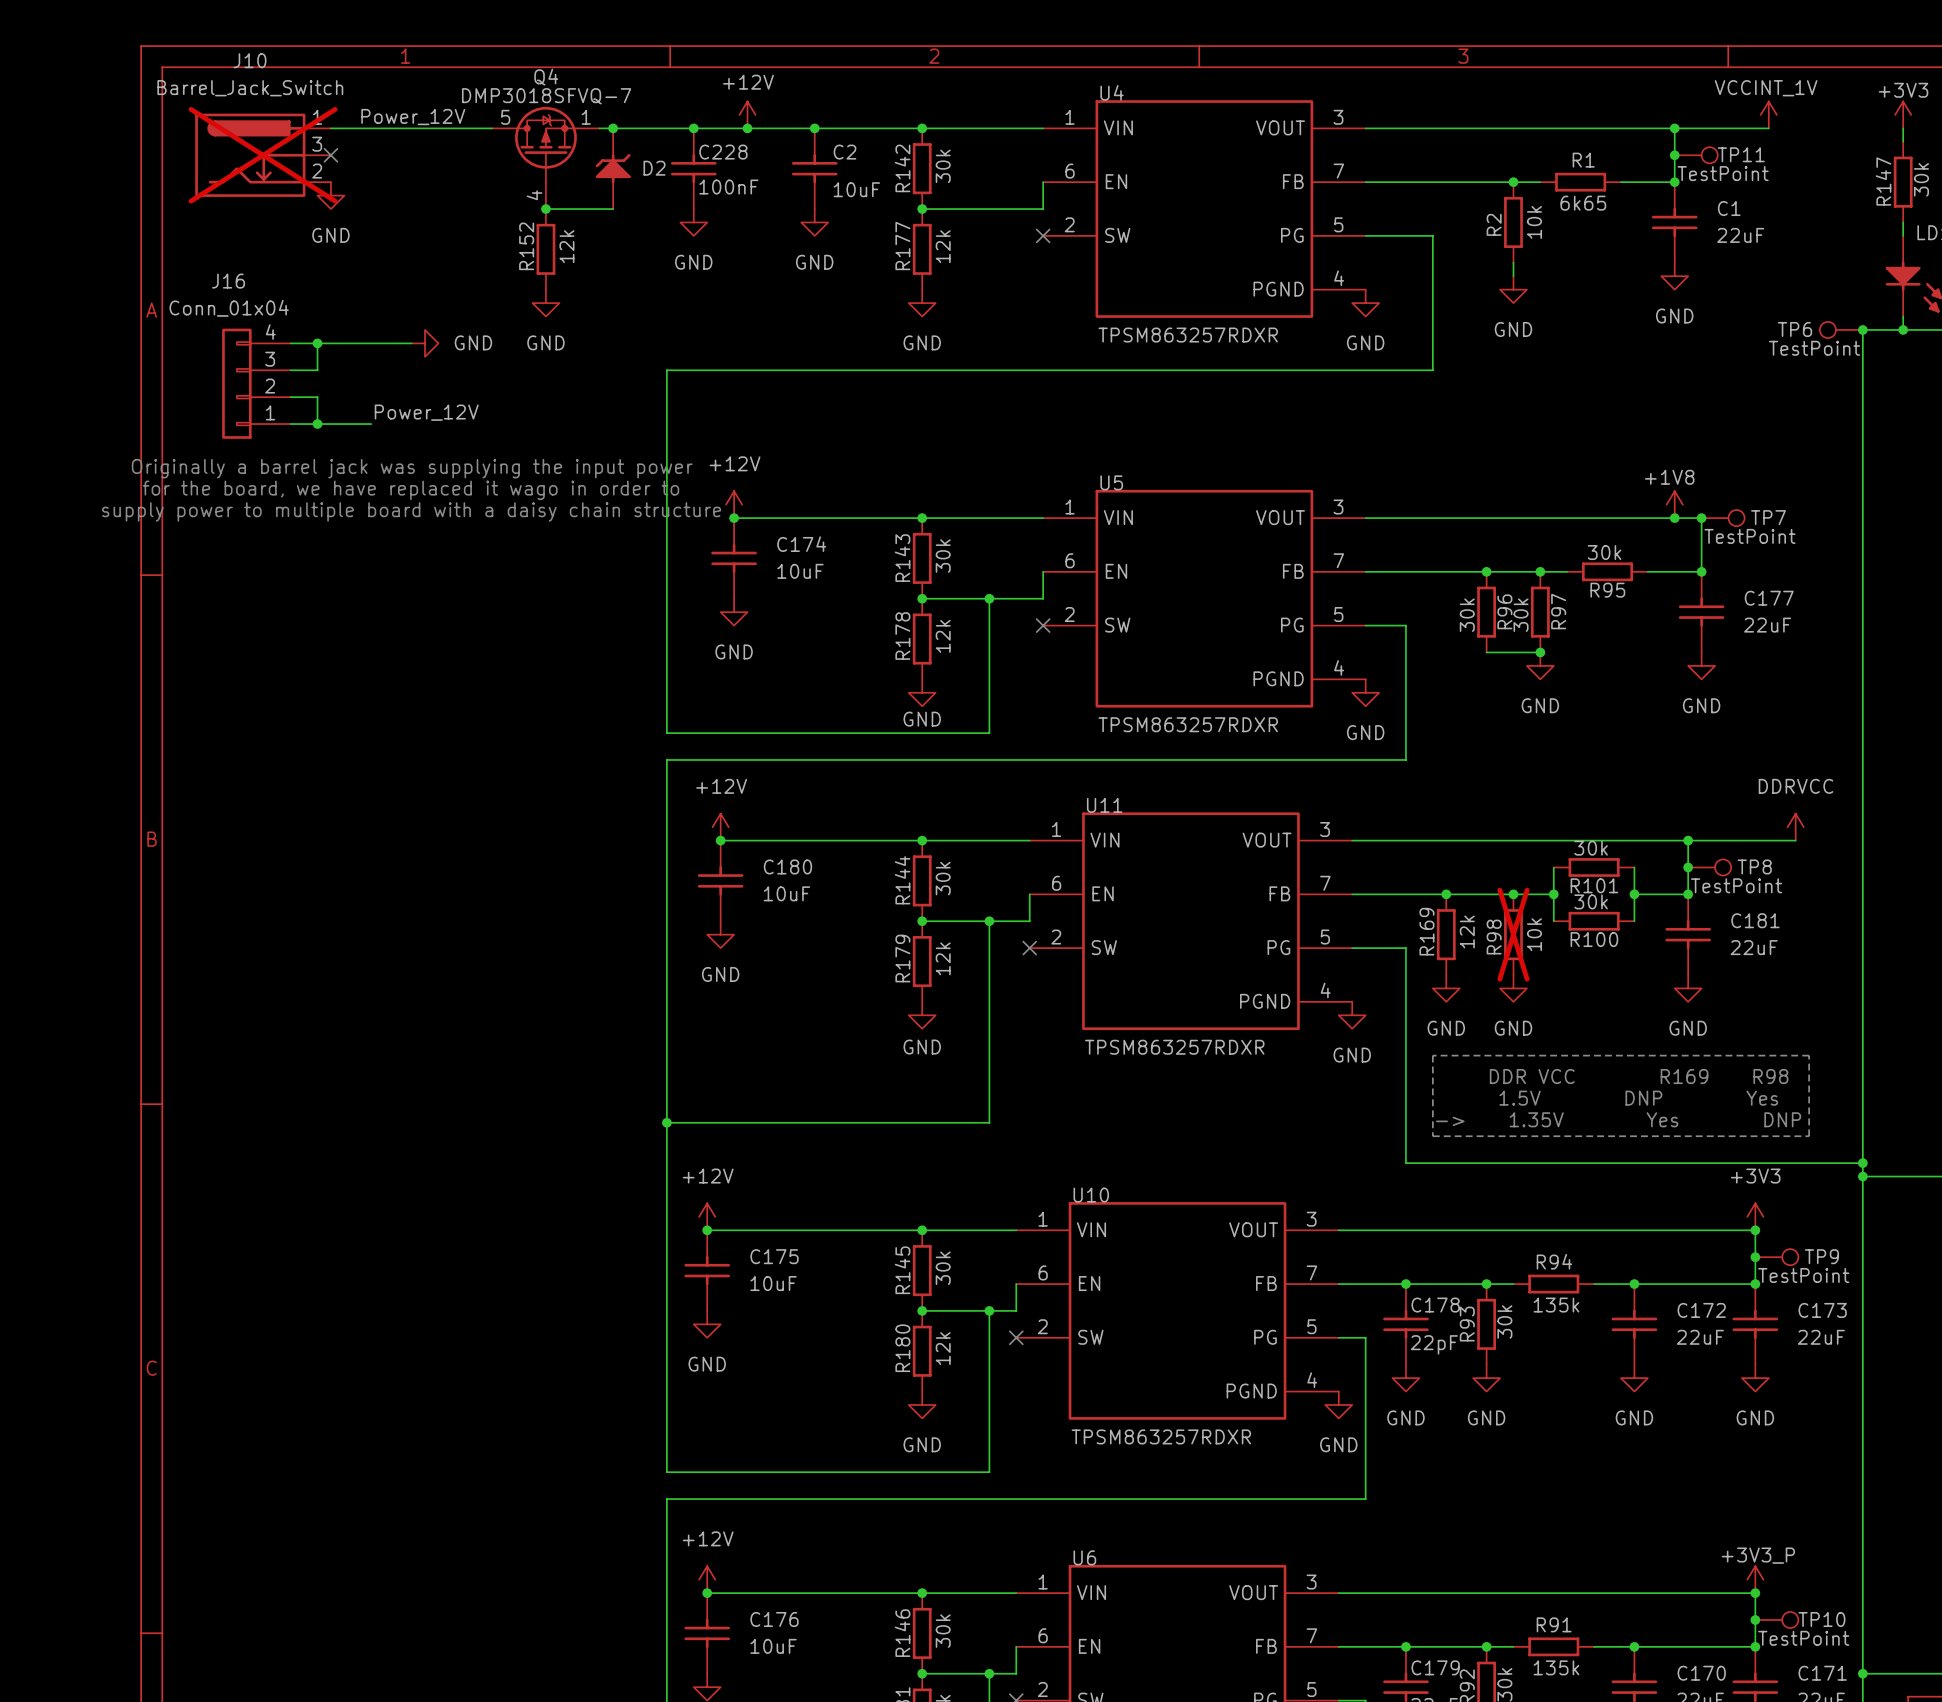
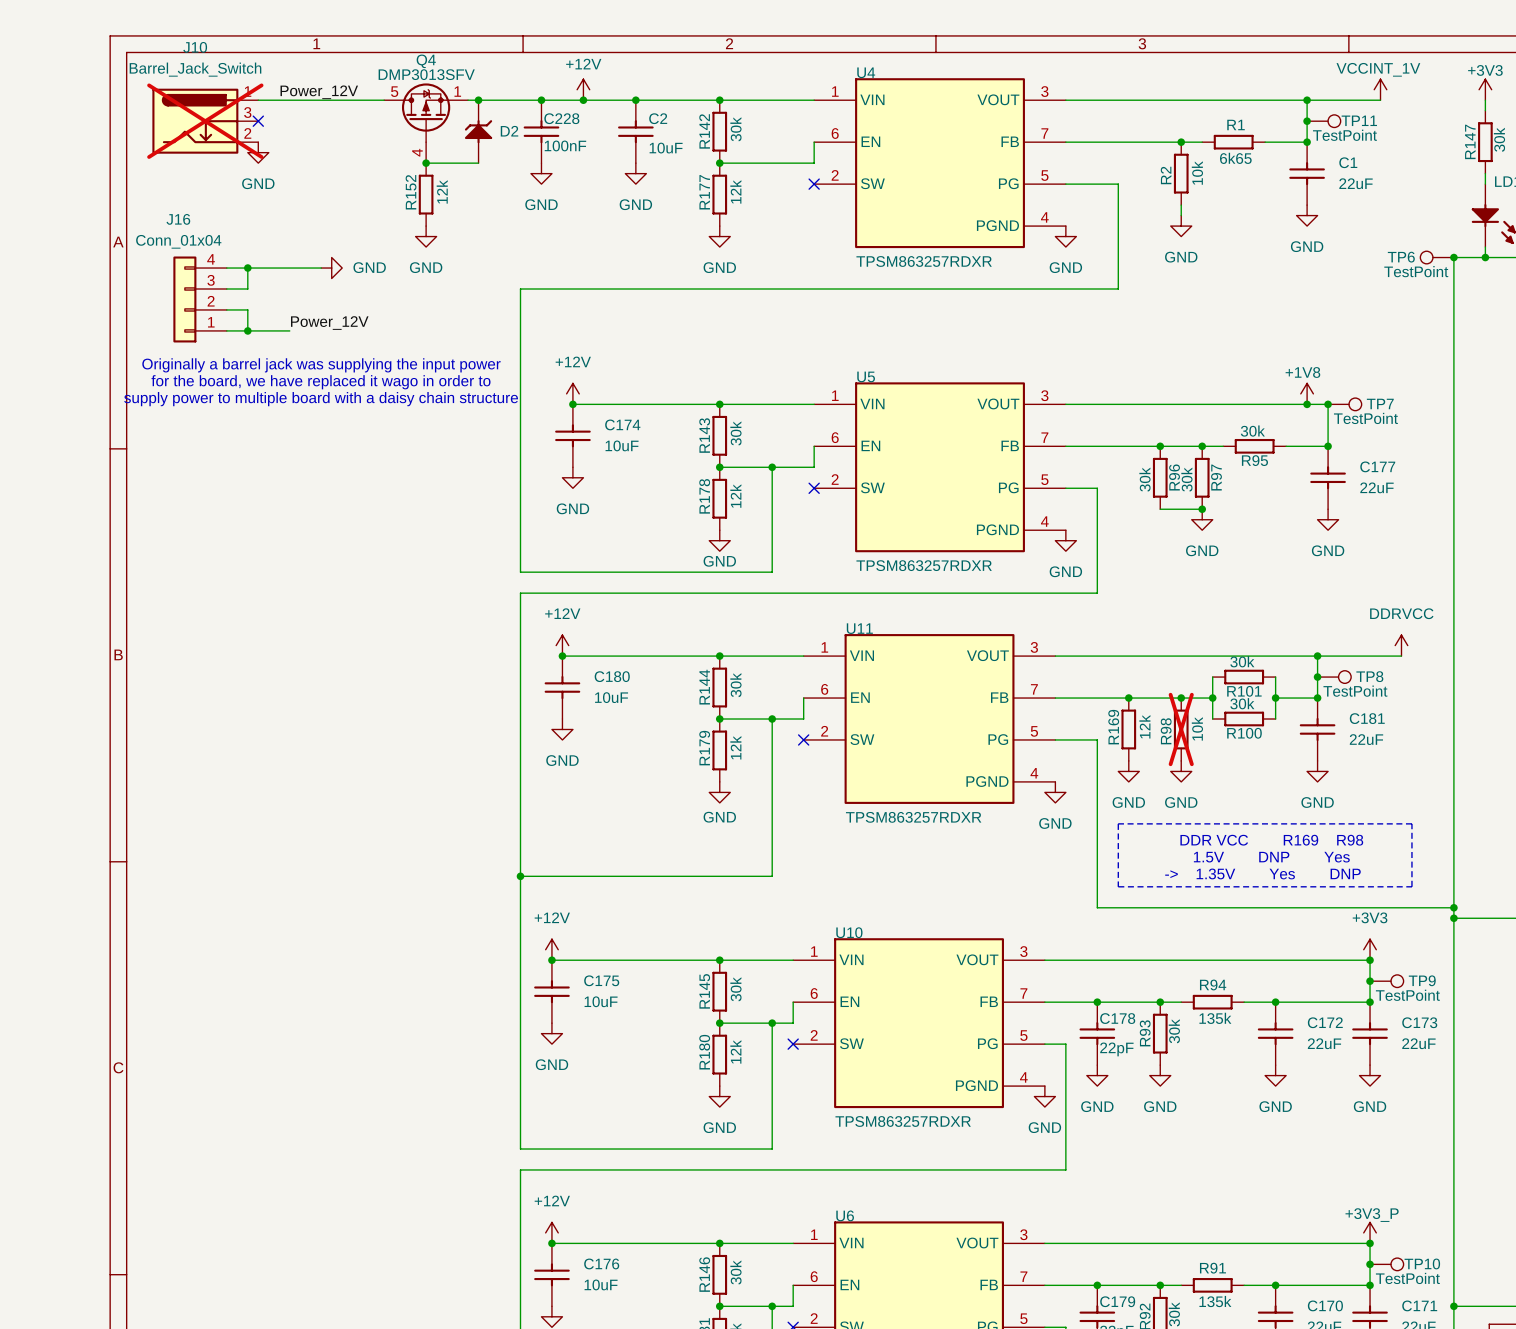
Q4 value: DMP3018SFVQ-7 (546, 96) -> DMP3013SFV (426, 74)

